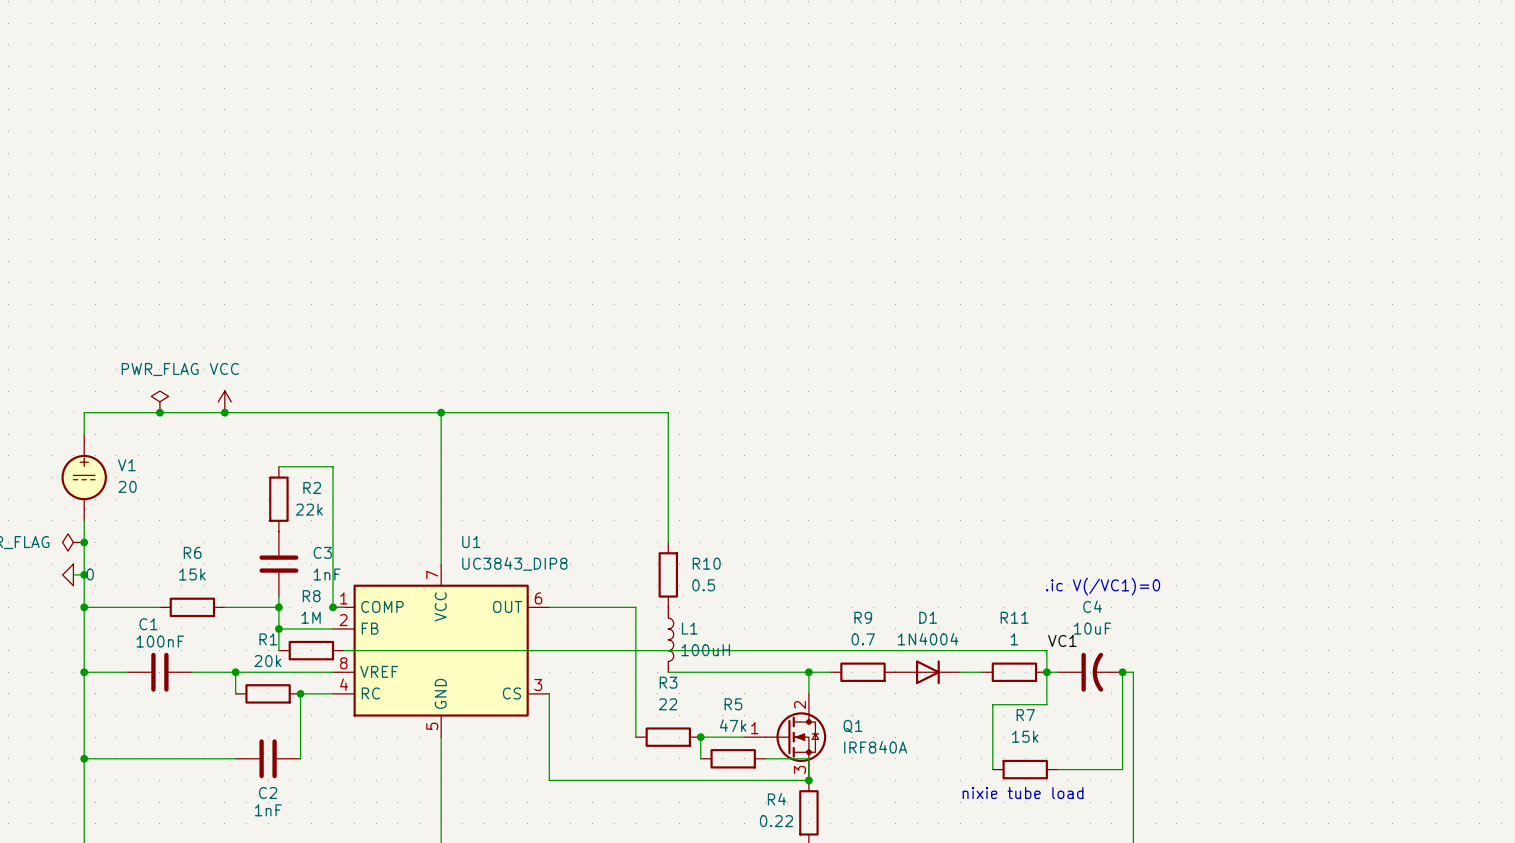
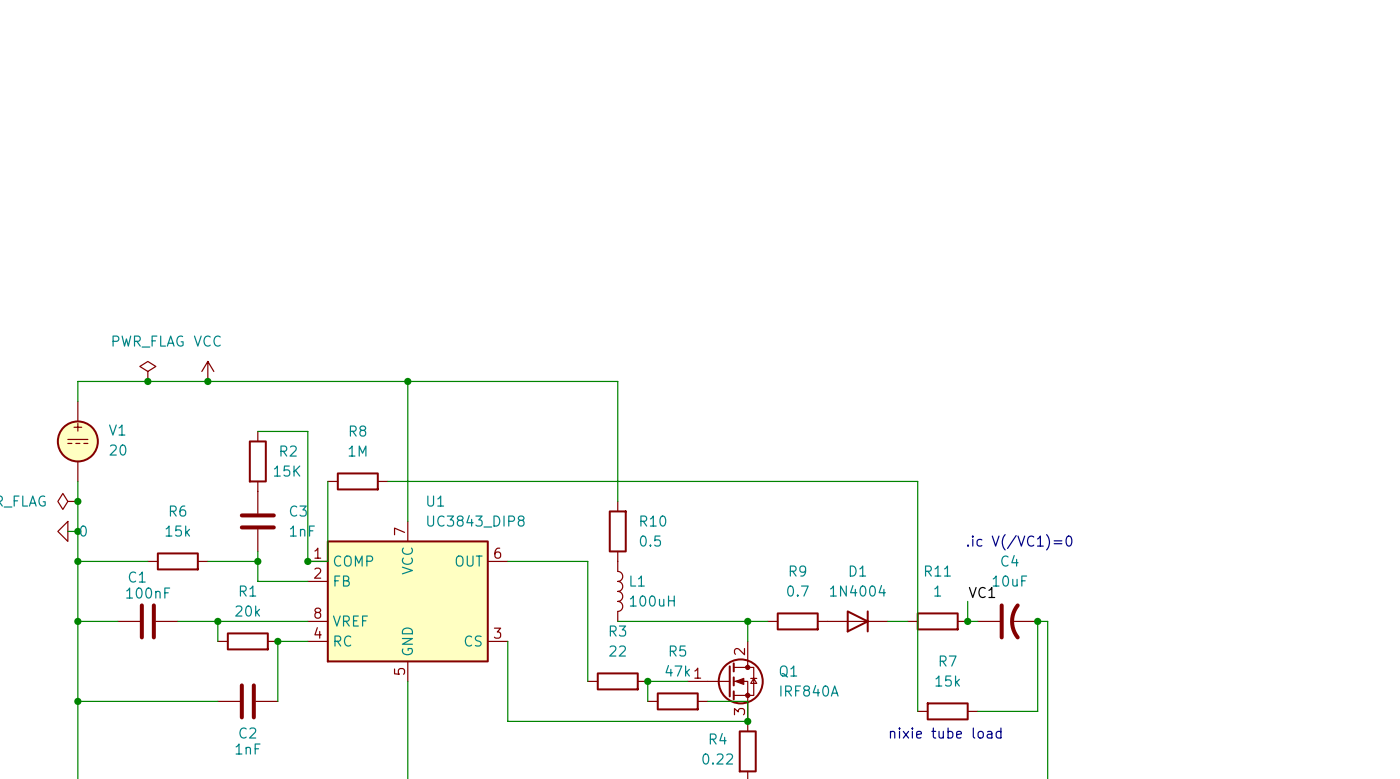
R2 value: 22k (309, 509) -> 15K (287, 471)
wire: none -> (327, 481) (327, 561) (317, 561)
wire: (278, 628) (278, 650) -> none
junction: (278, 628) -> none
R8 position: (311, 650) -> (357, 481)
wire: (343, 650) (1046, 650) -> none
wire: (1046, 672) (1046, 704) (992, 704) -> (387, 481) (917, 481) (917, 651)

